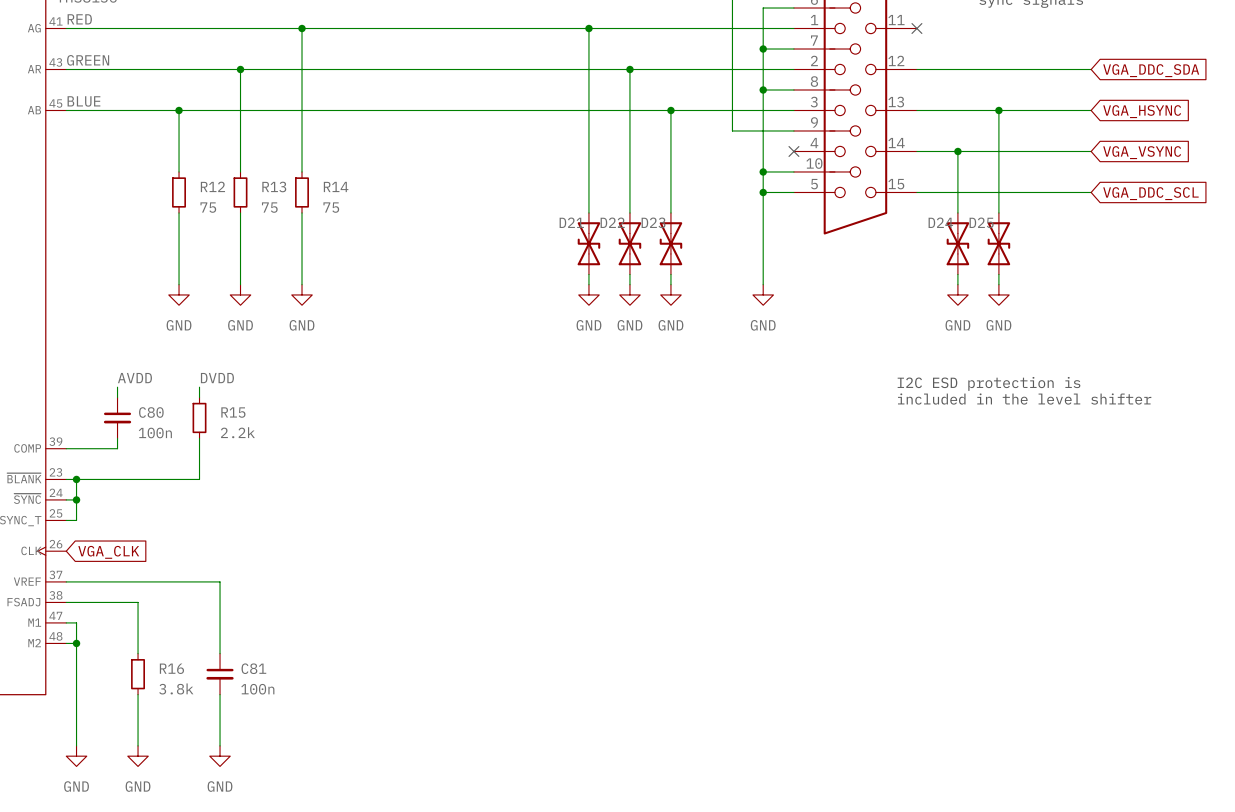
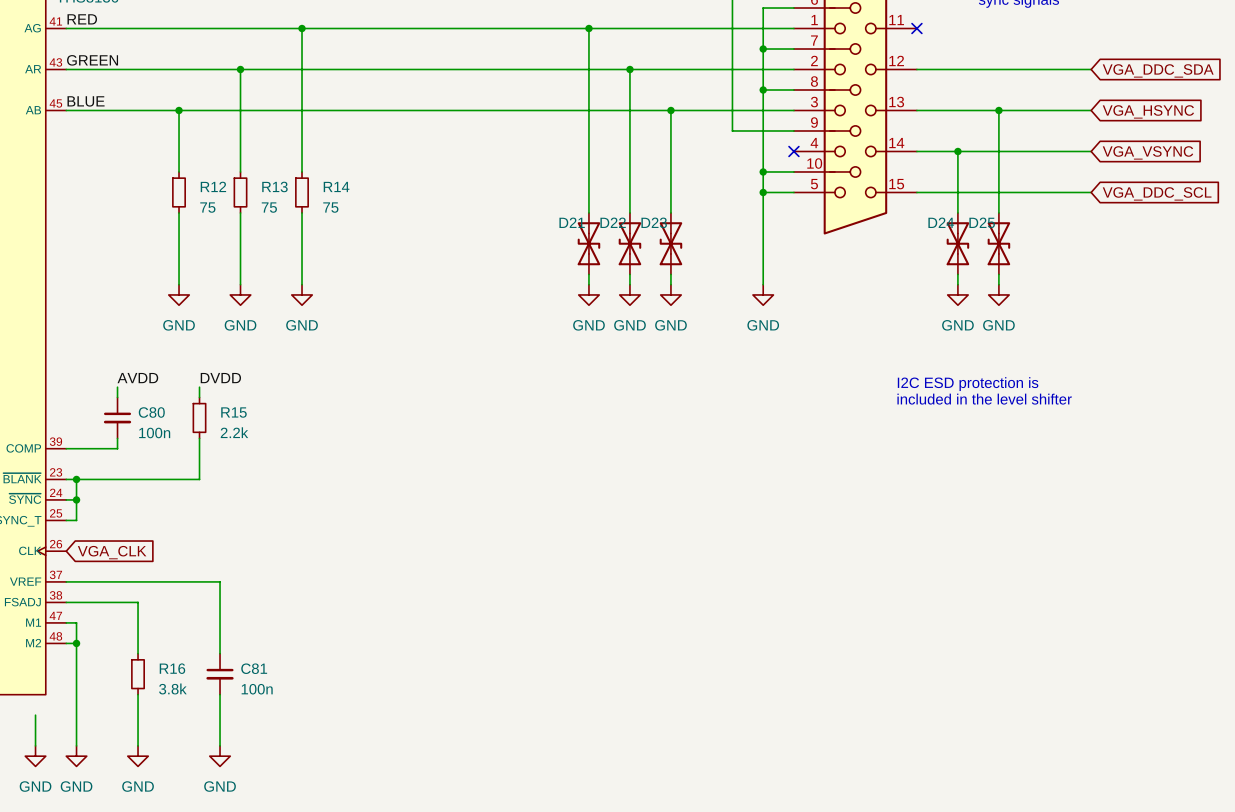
wire: none -> (35, 715) (35, 745)
power symbol: none -> GND (35, 756)

